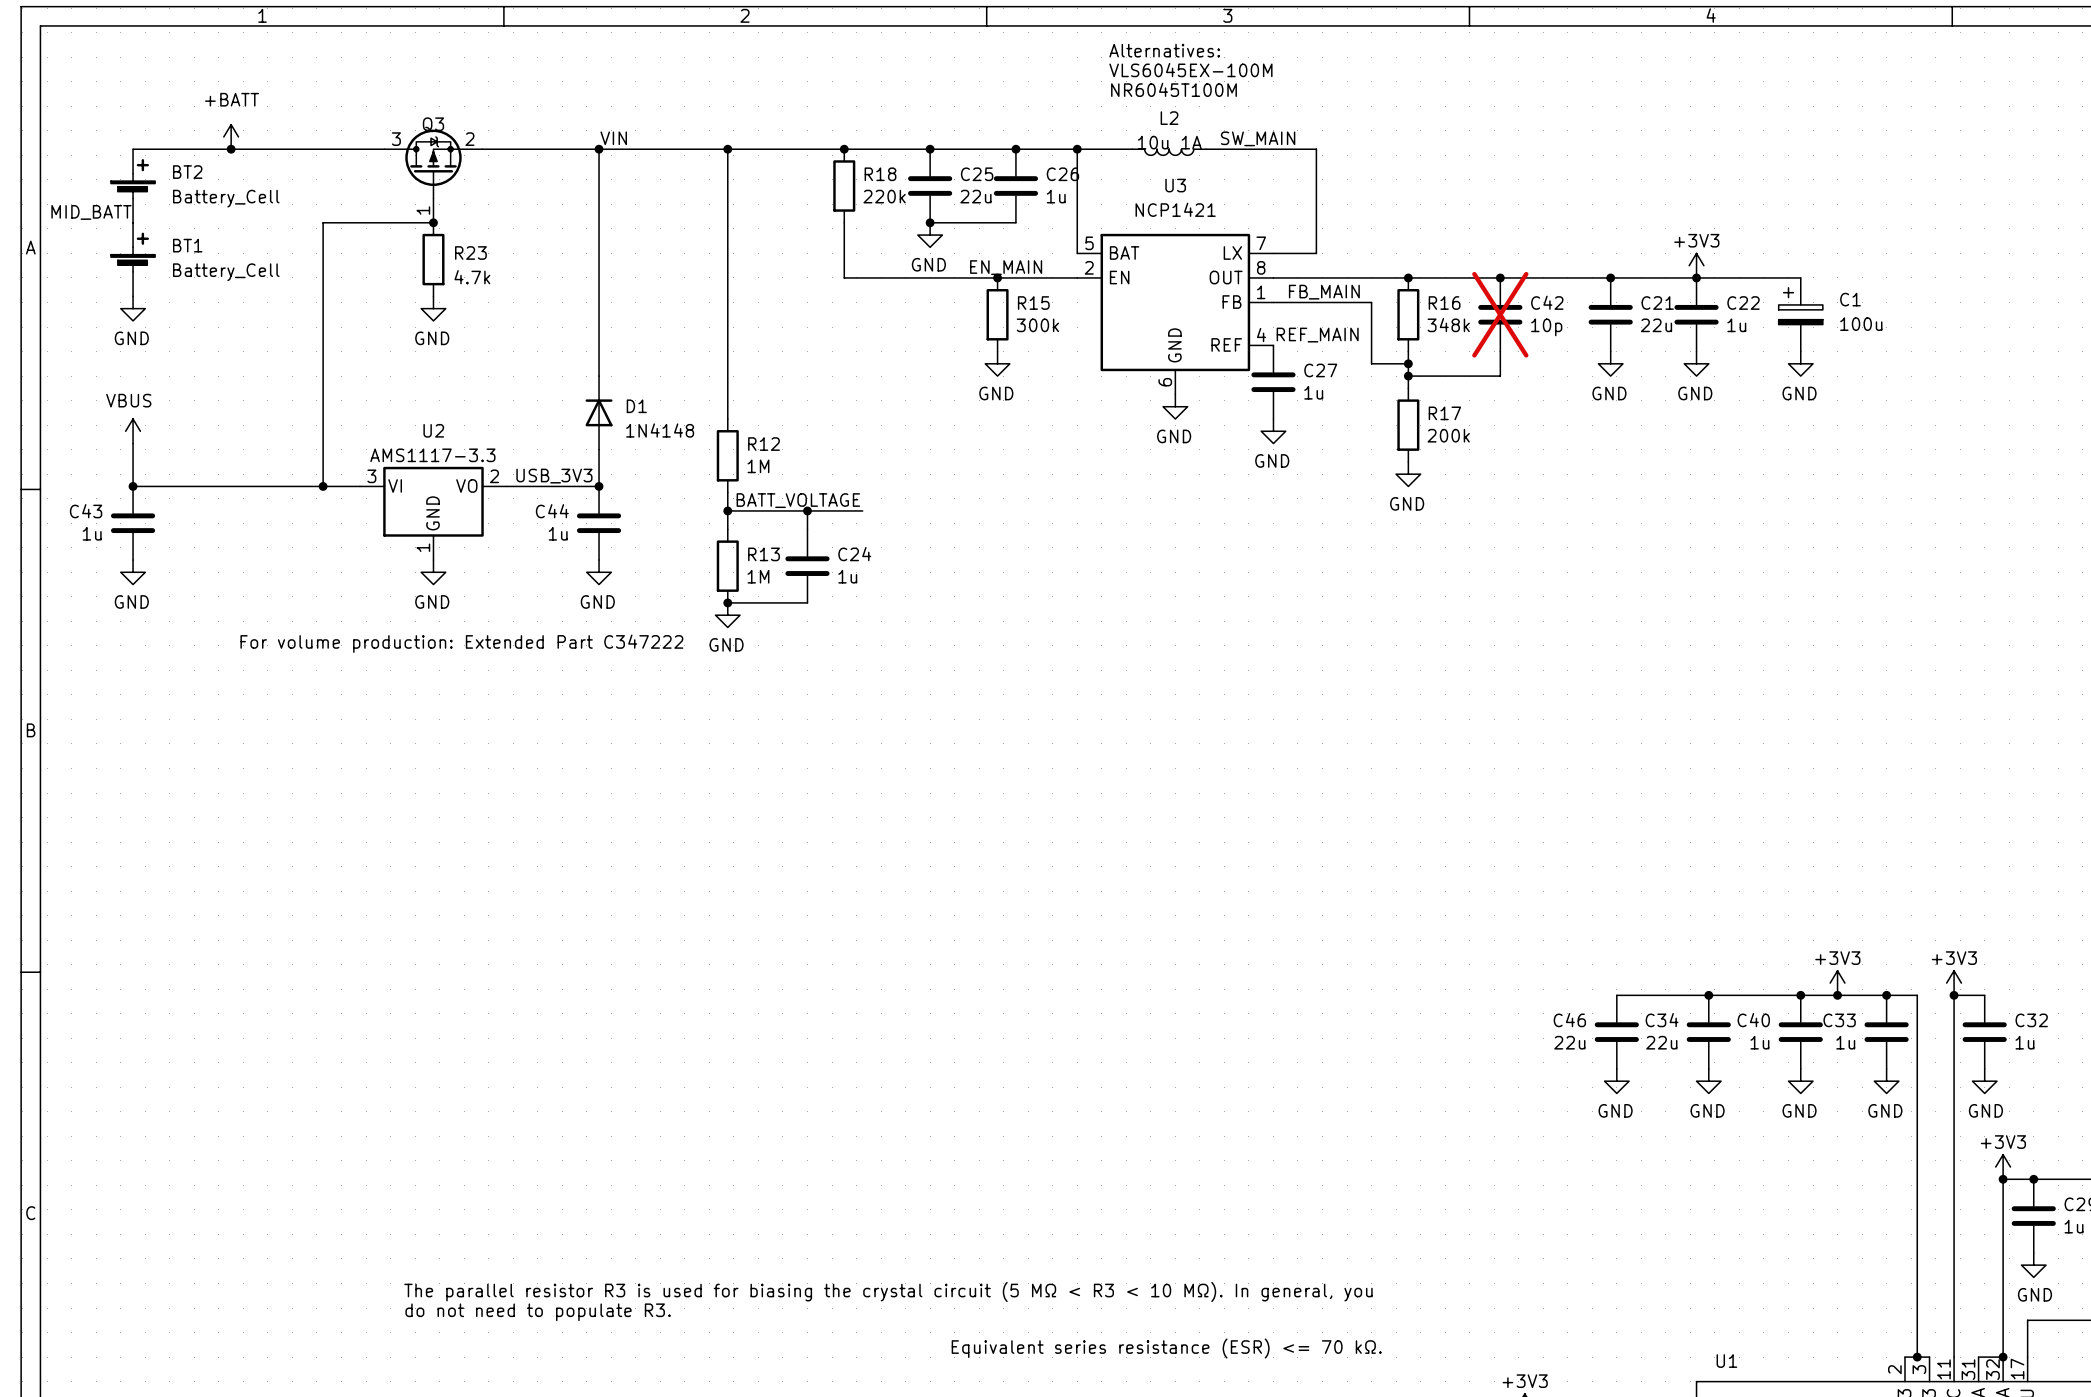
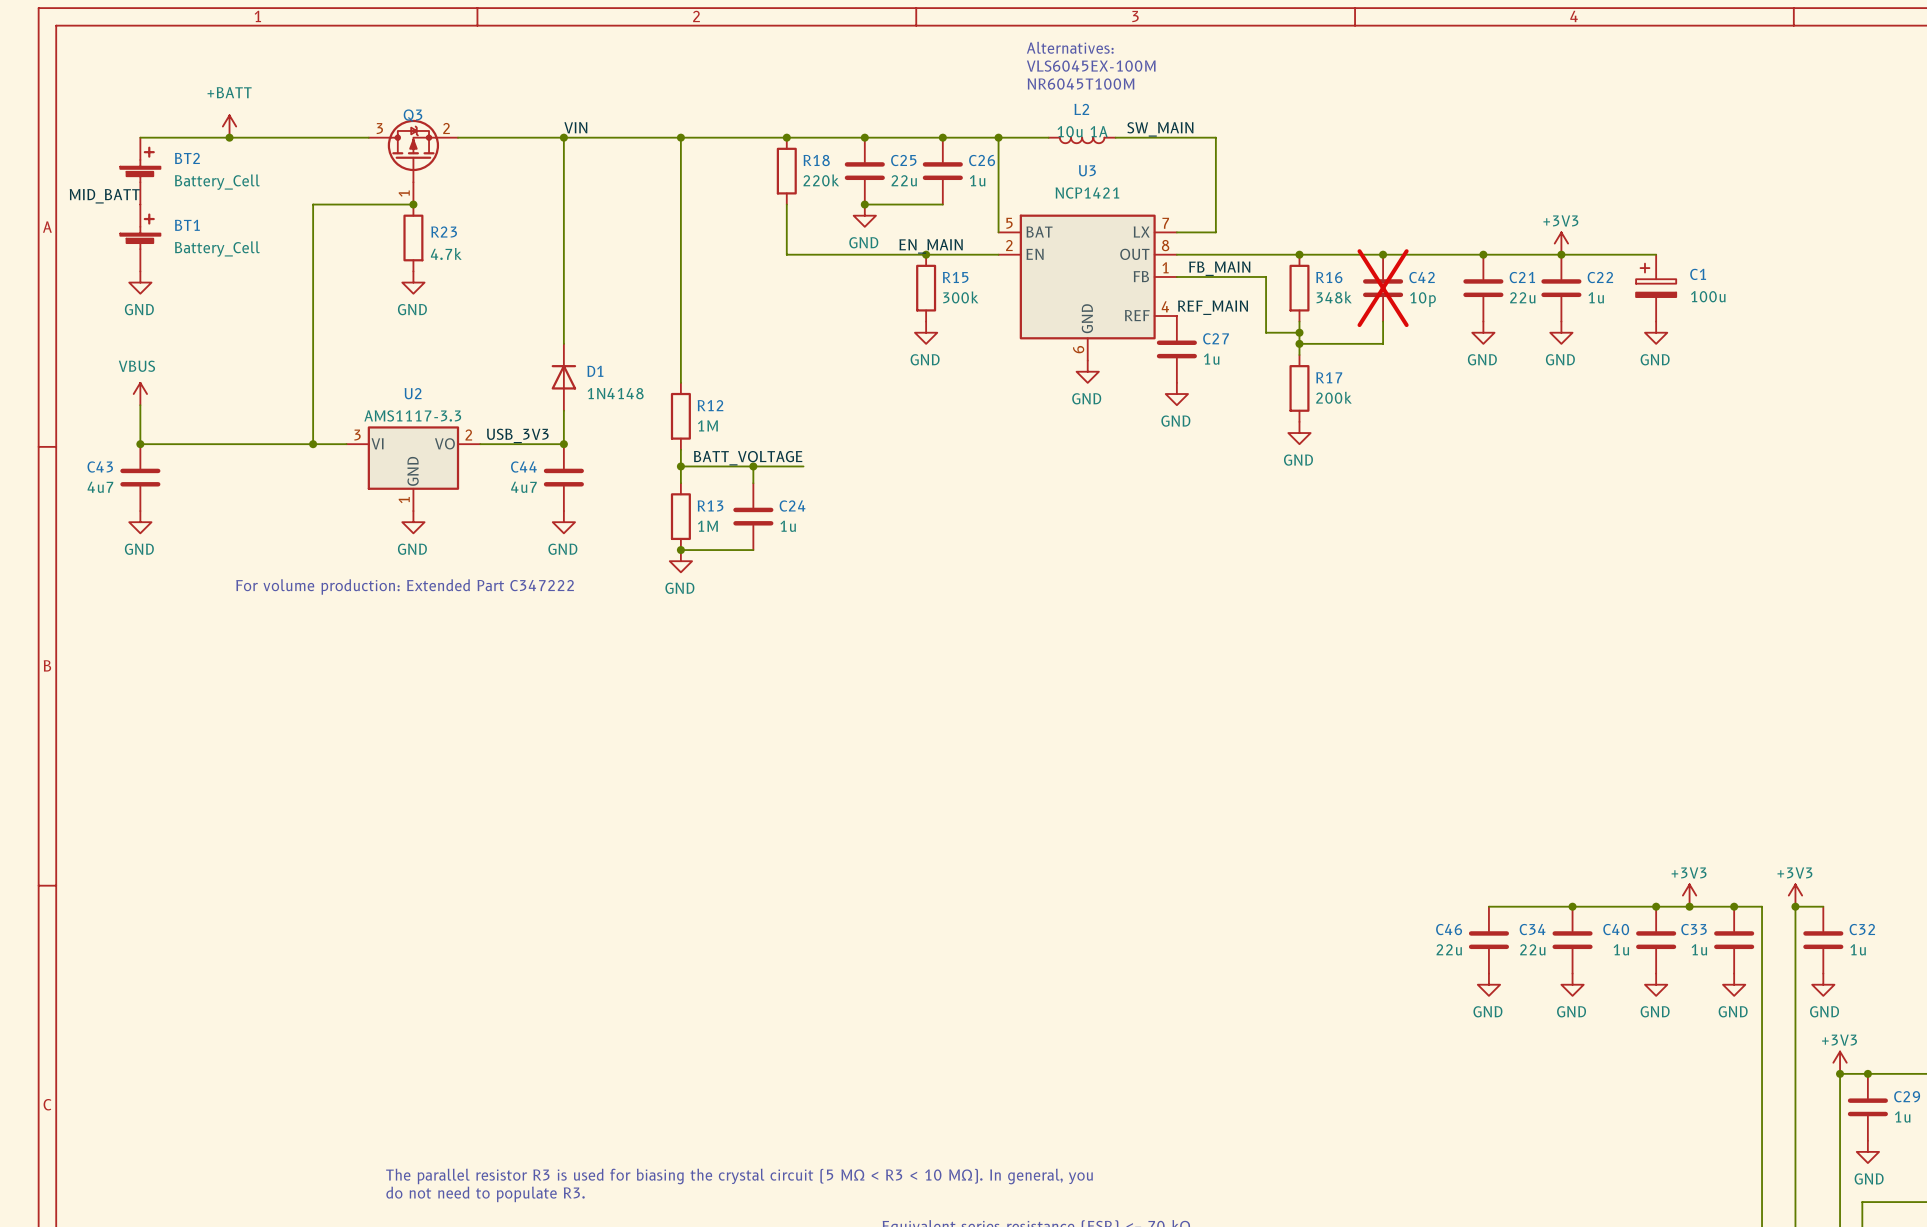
C43 value: 1u (92, 533) -> 4u7 (100, 487)
C44 value: 1u (558, 533) -> 4u7 (523, 487)

